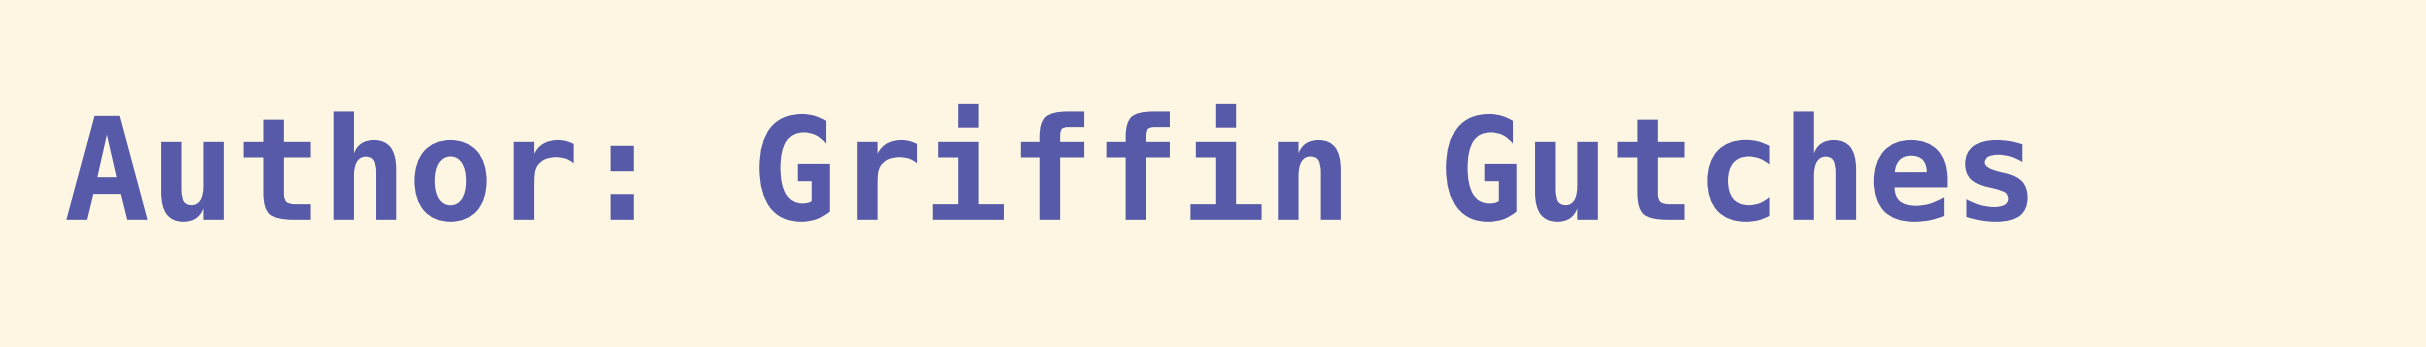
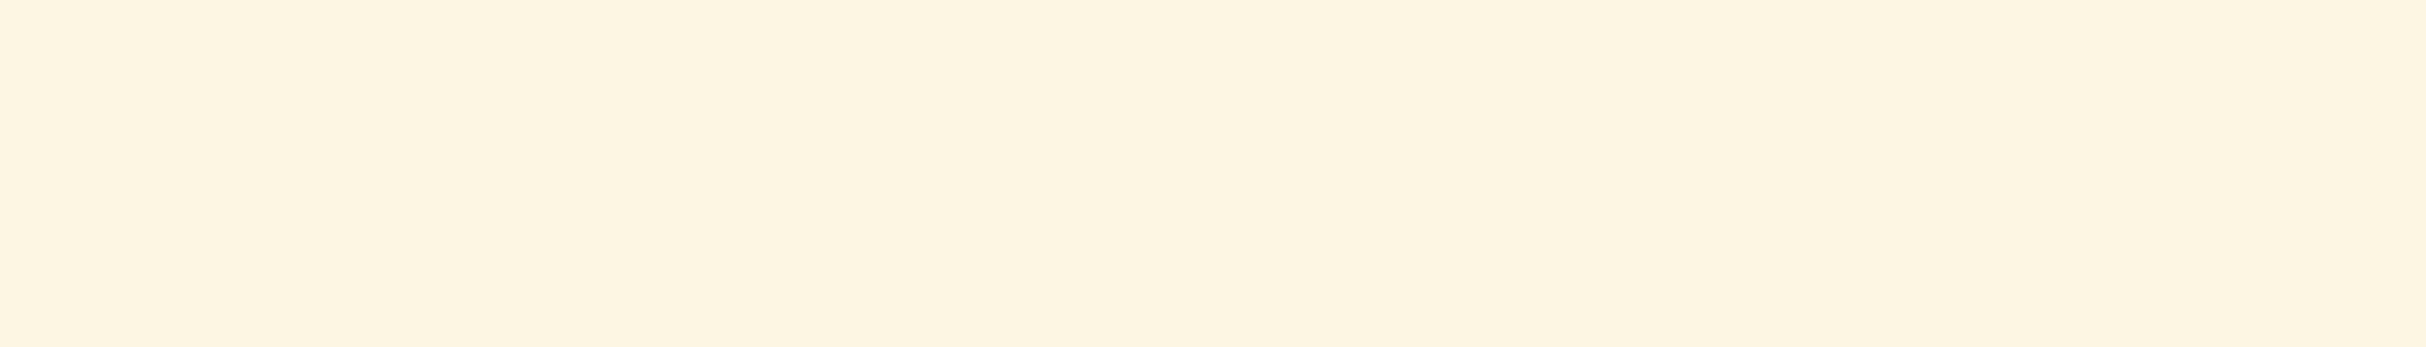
text: Author: Griffin Gutches (1046, 162) -> none

